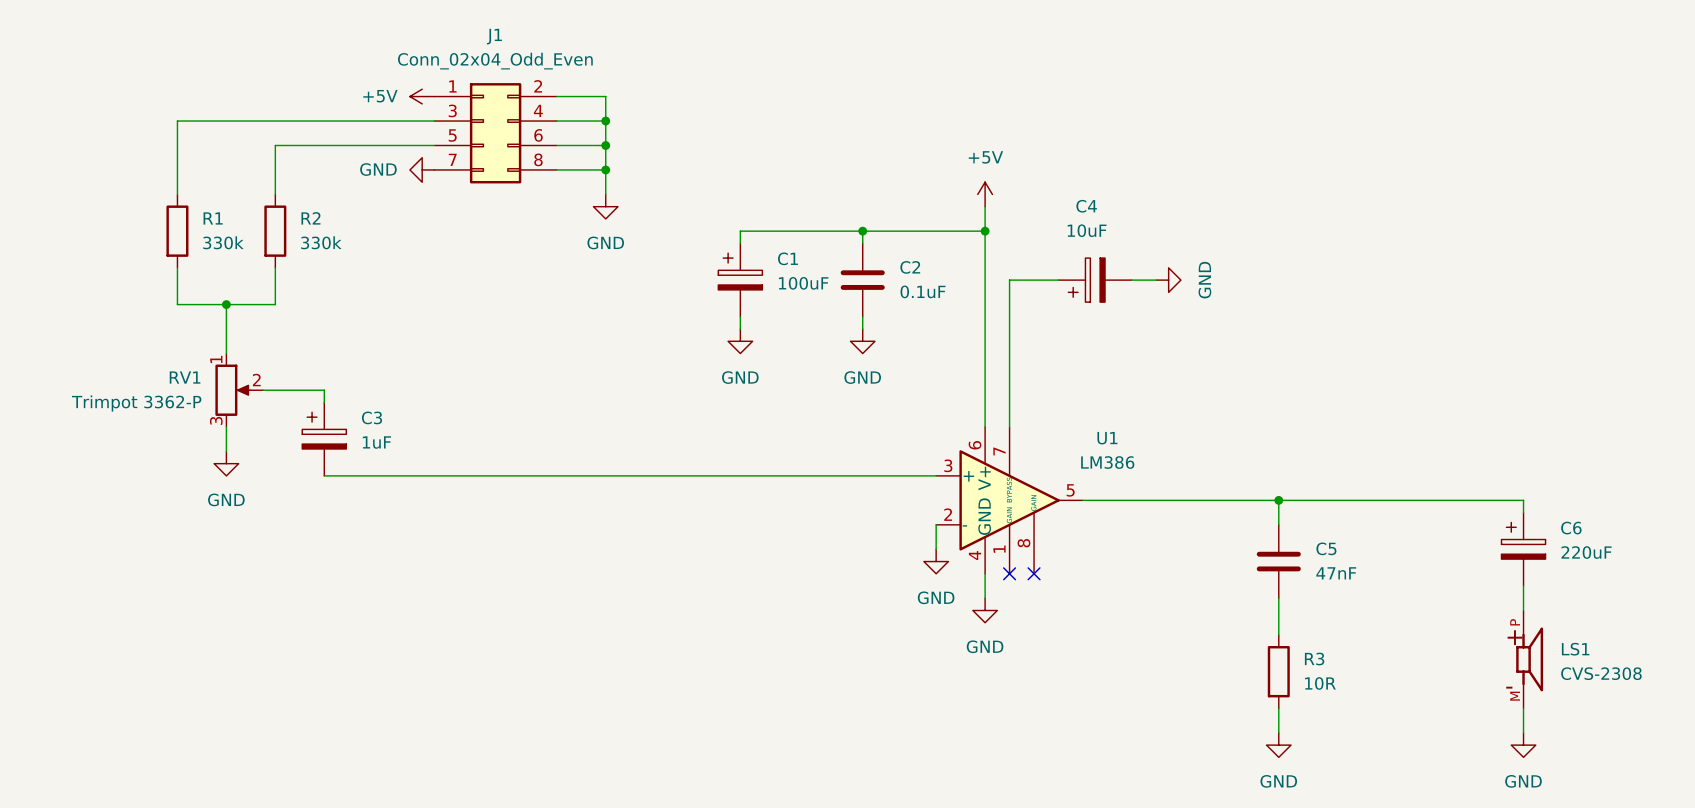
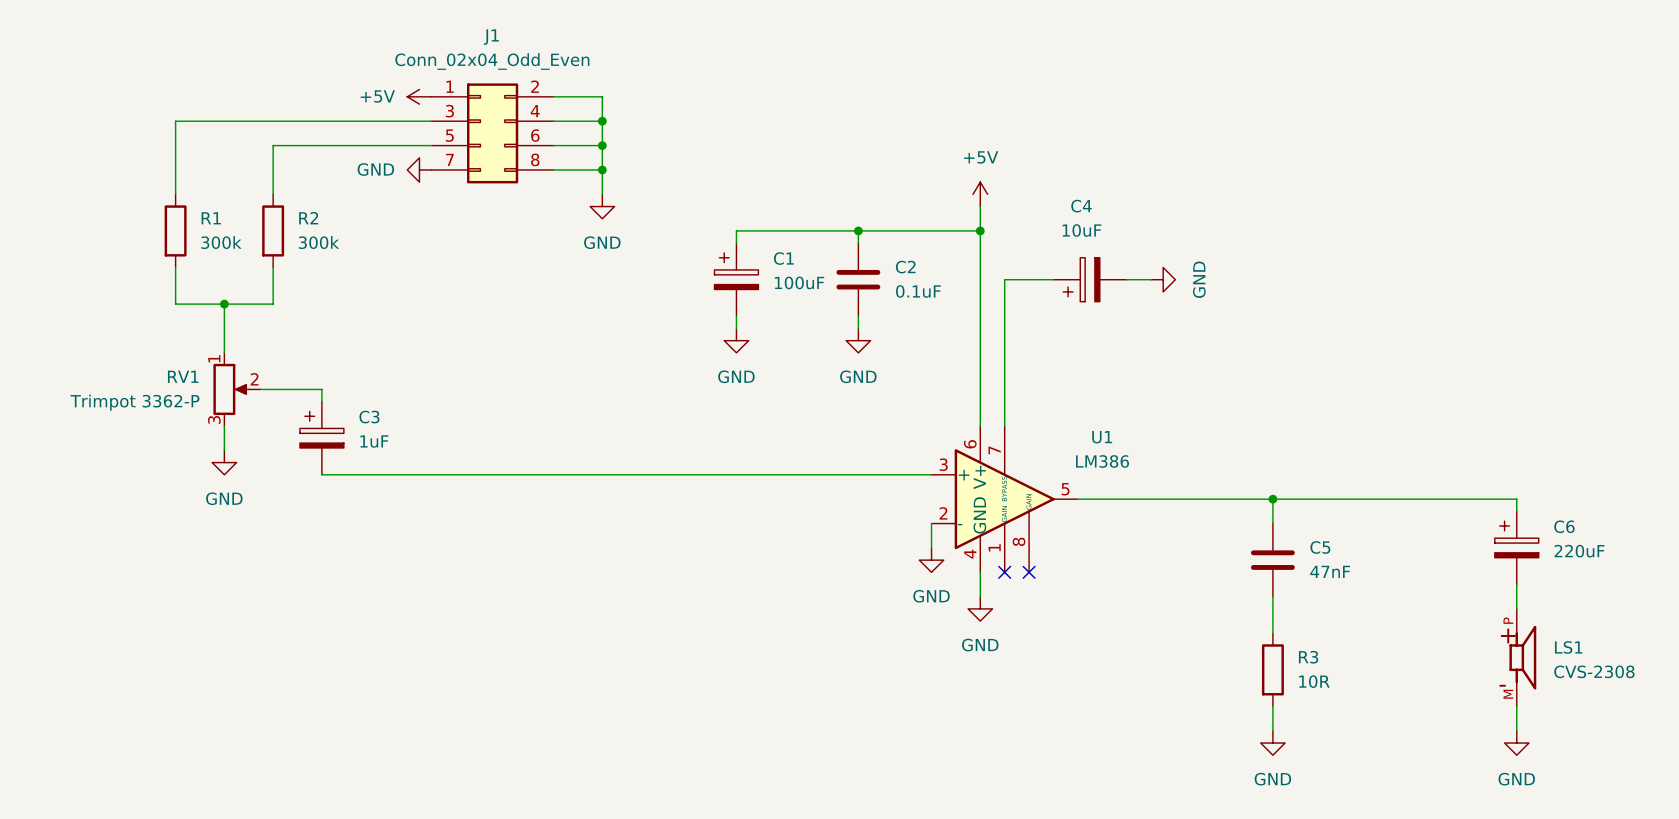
R1 value: 330k (223, 242) -> 300k (221, 242)
R2 value: 330k (321, 242) -> 300k (318, 242)

